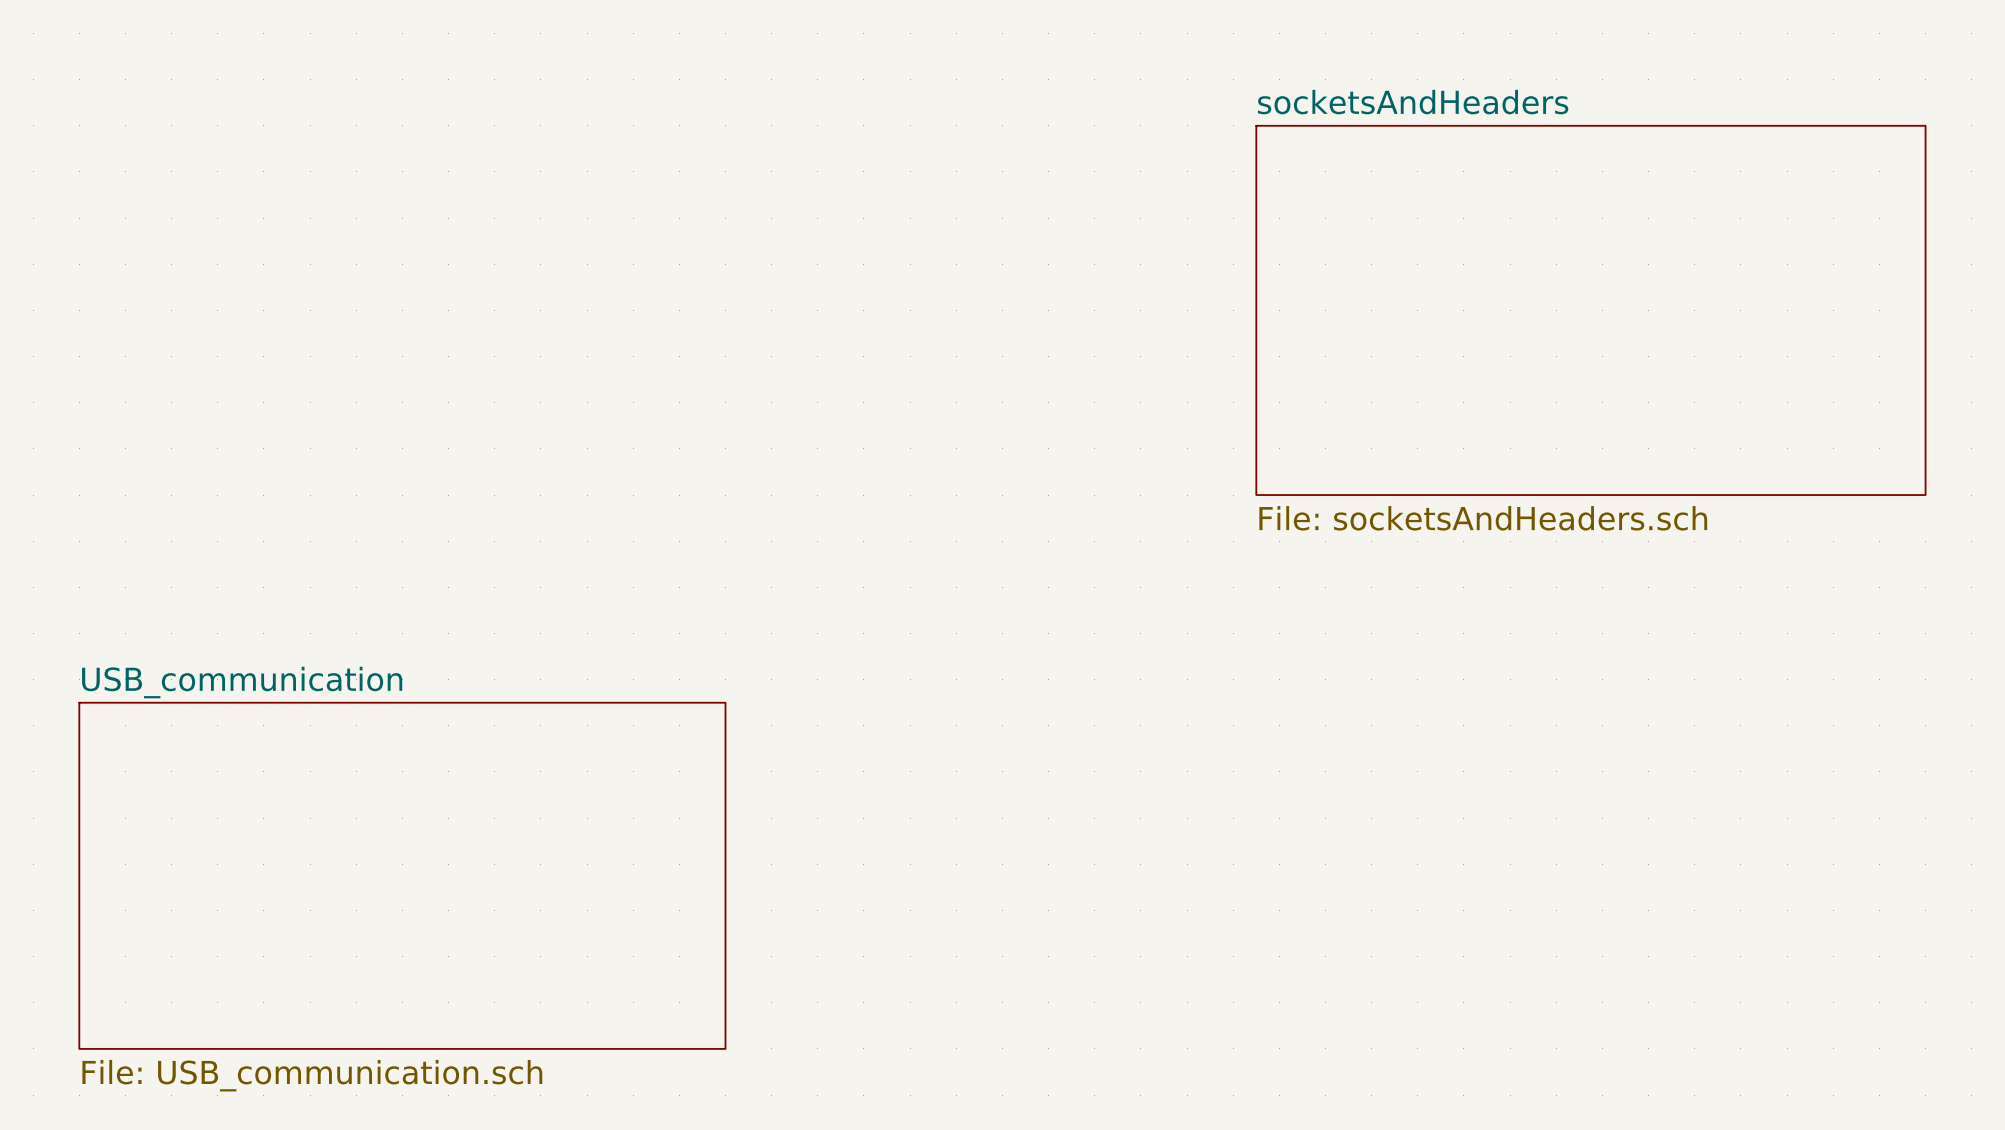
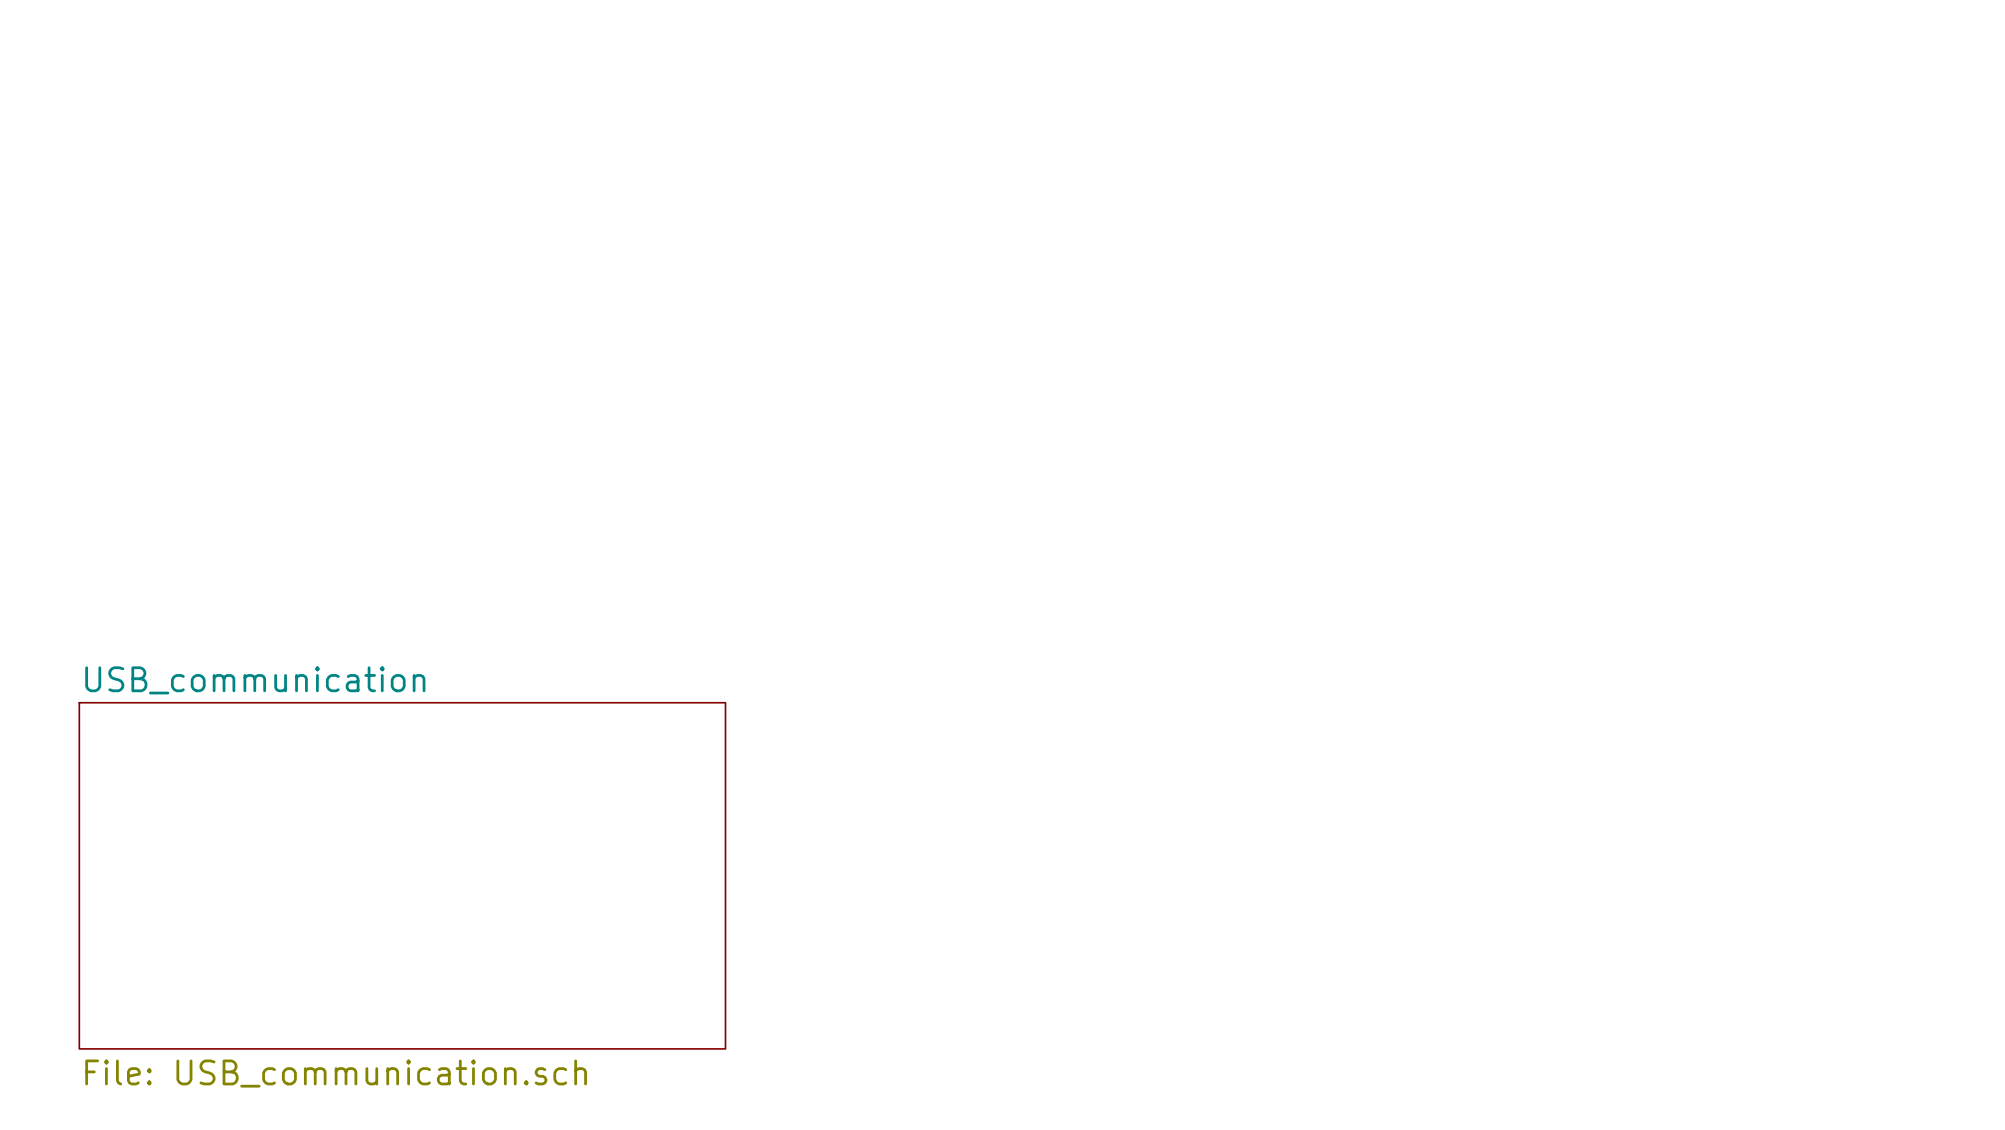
sheet socketsAndHeaders: File: socketsAndHeaders.sch (1590, 310) -> none

